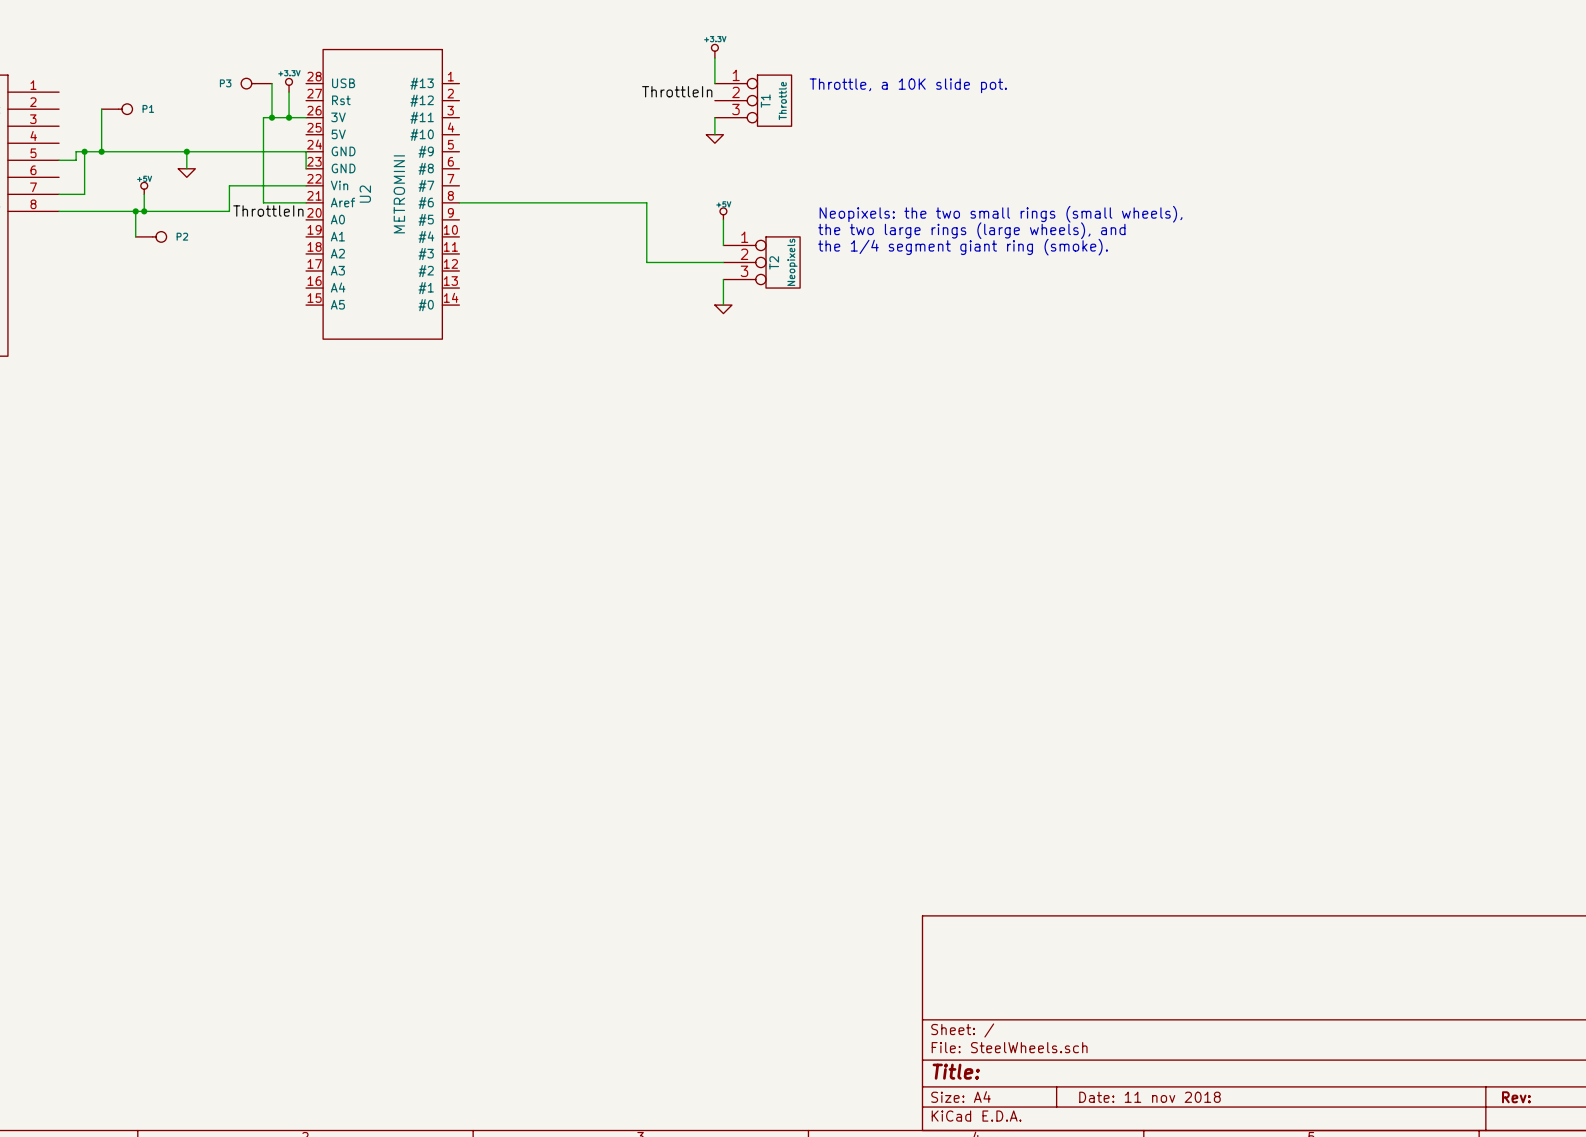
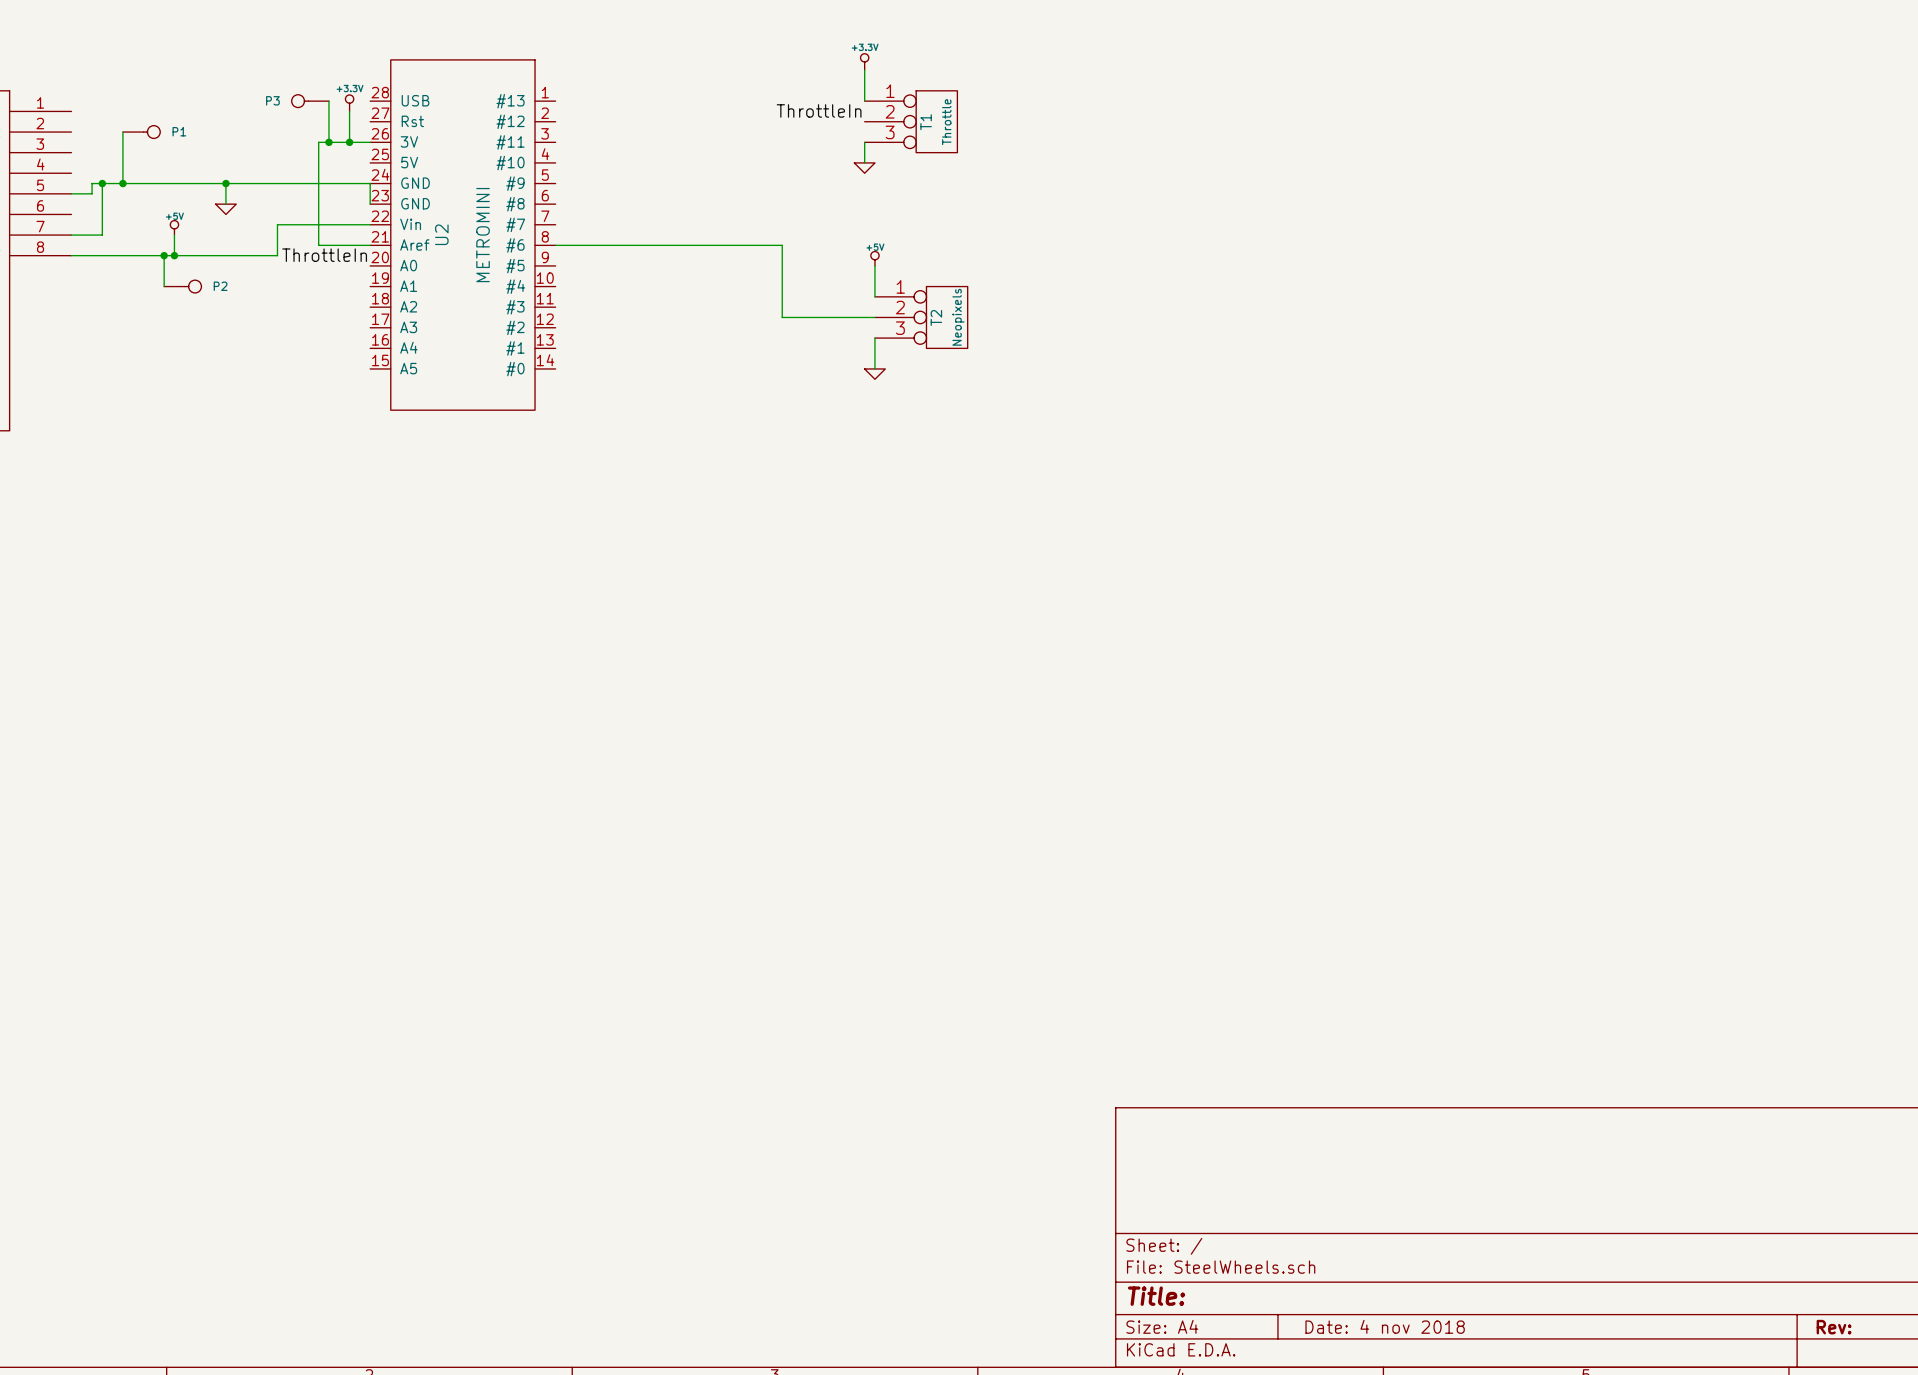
text: Throttle, a 10K slide pot. (908, 85) -> none
text: Neopixels: the two small rings (small wheels), (1001, 214) -> none
text: the two large rings (large wheels), and (971, 230) -> none
text: the 1/4 segment giant ring (smoke). (963, 247) -> none
title block: Date: 11 nov 2018 (1150, 1097) -> Date: 4 nov 2018 (1385, 1326)

